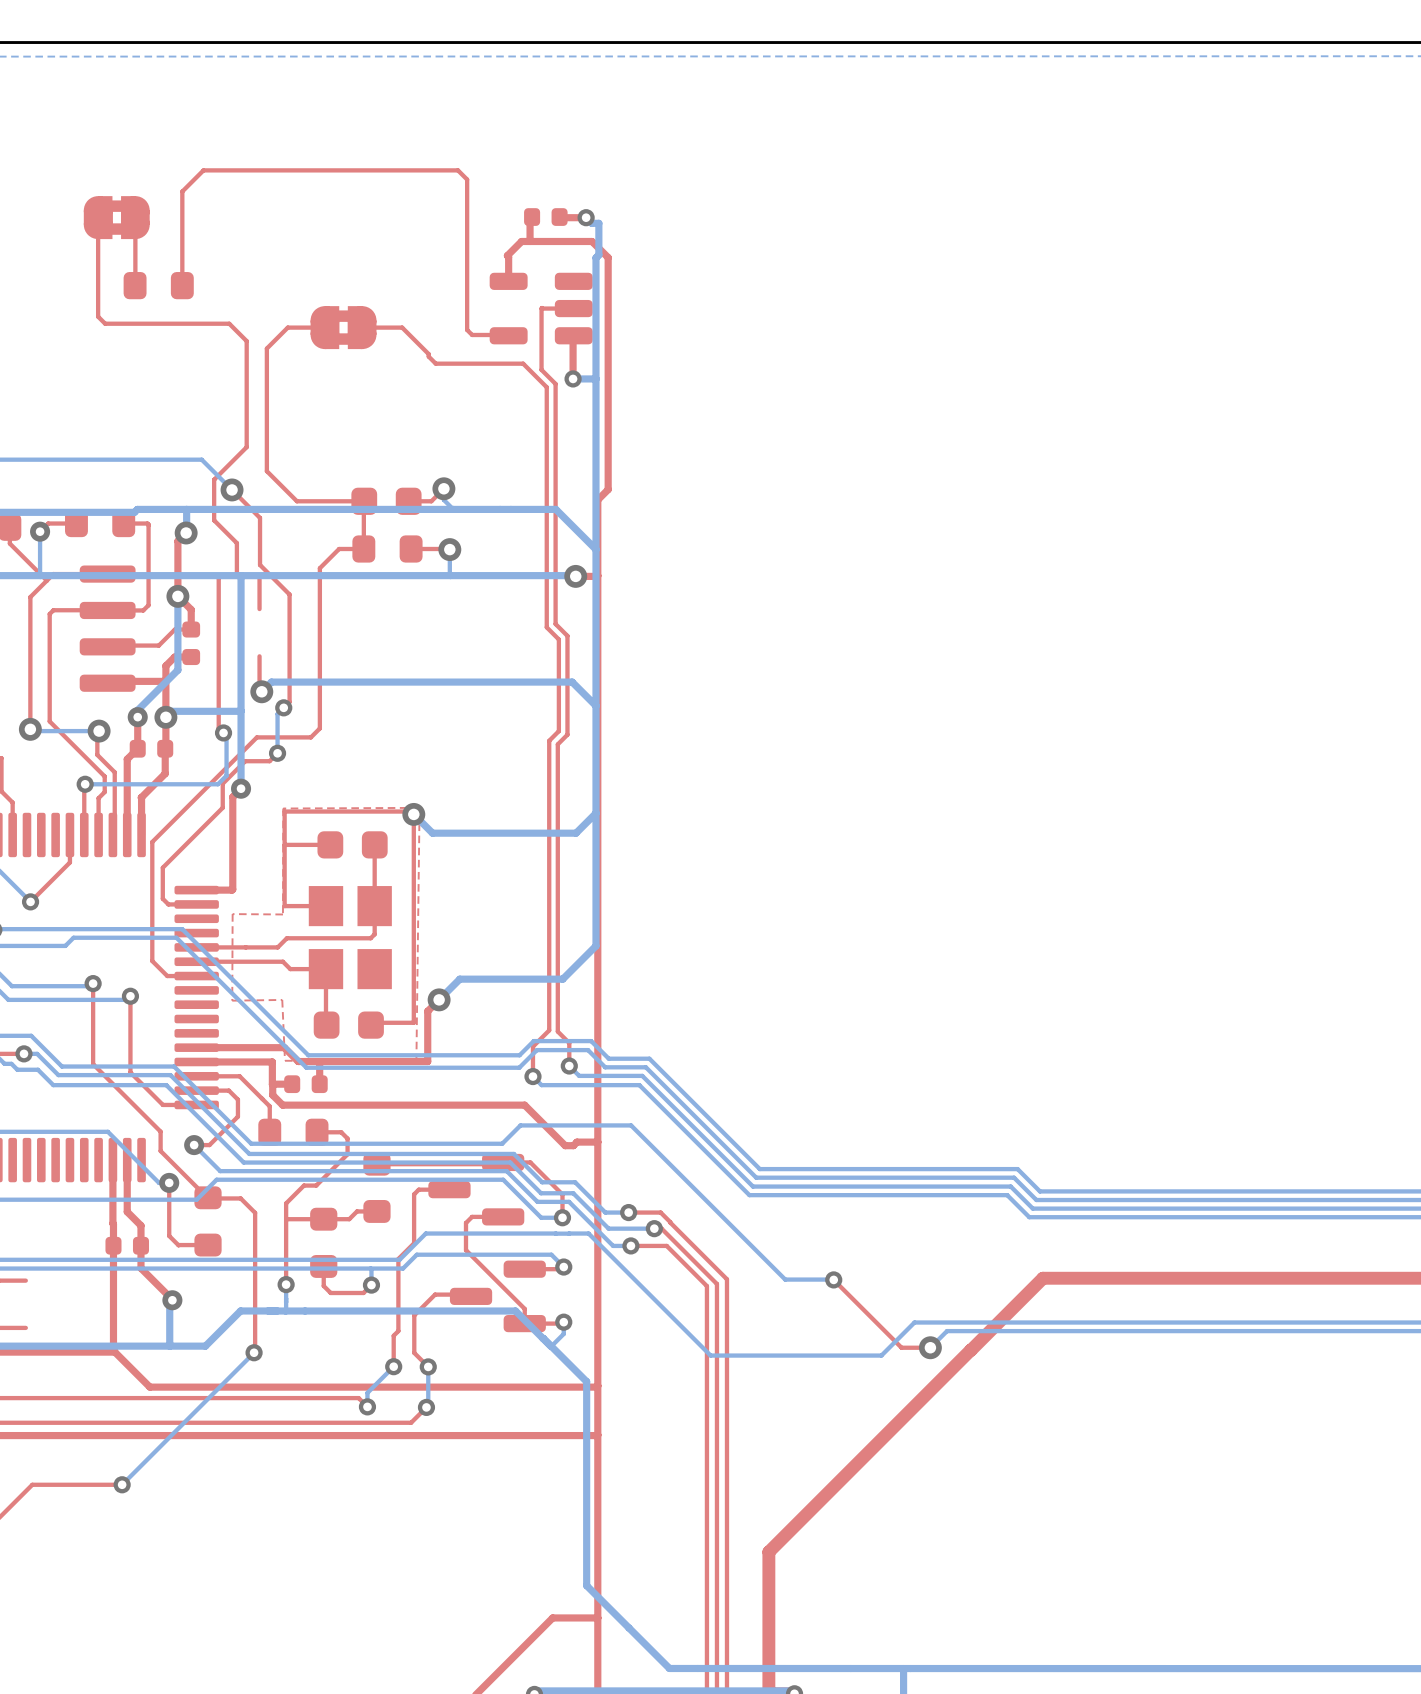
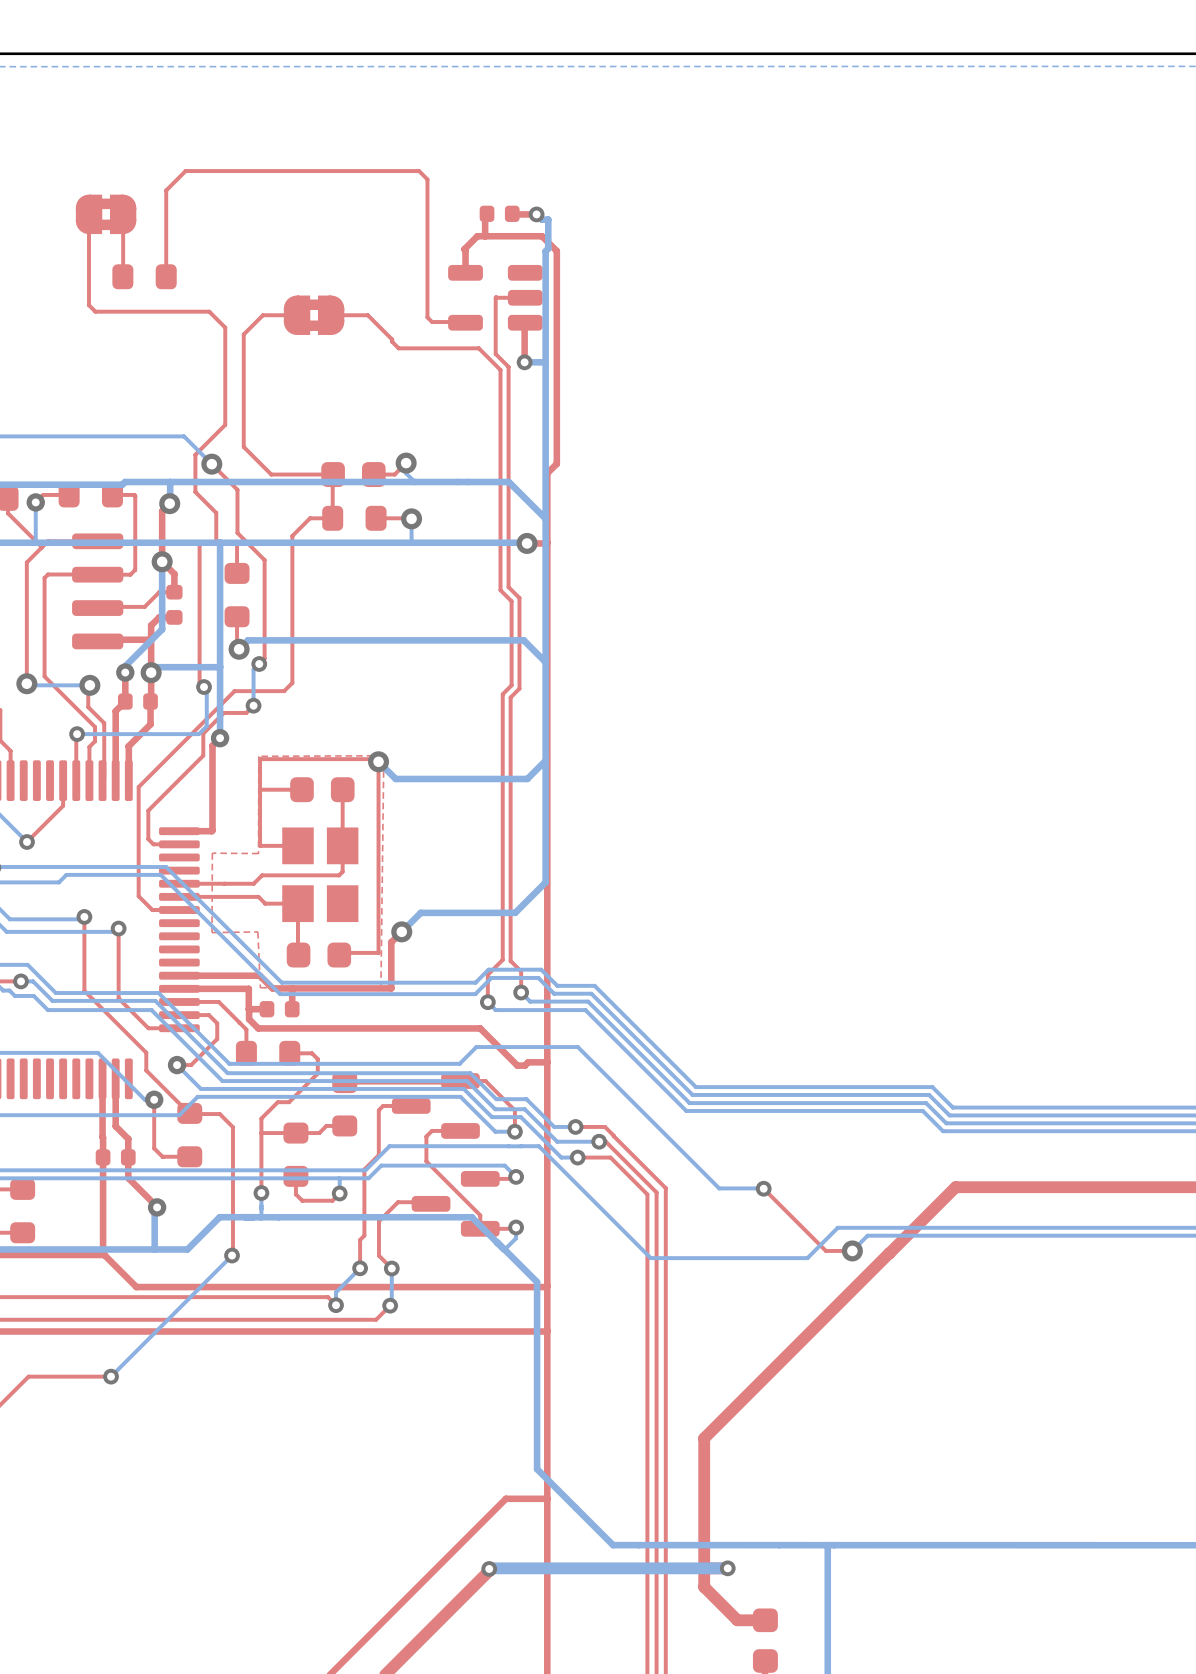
part: none -> (237, 595)
part: none -> (22, 1211)

